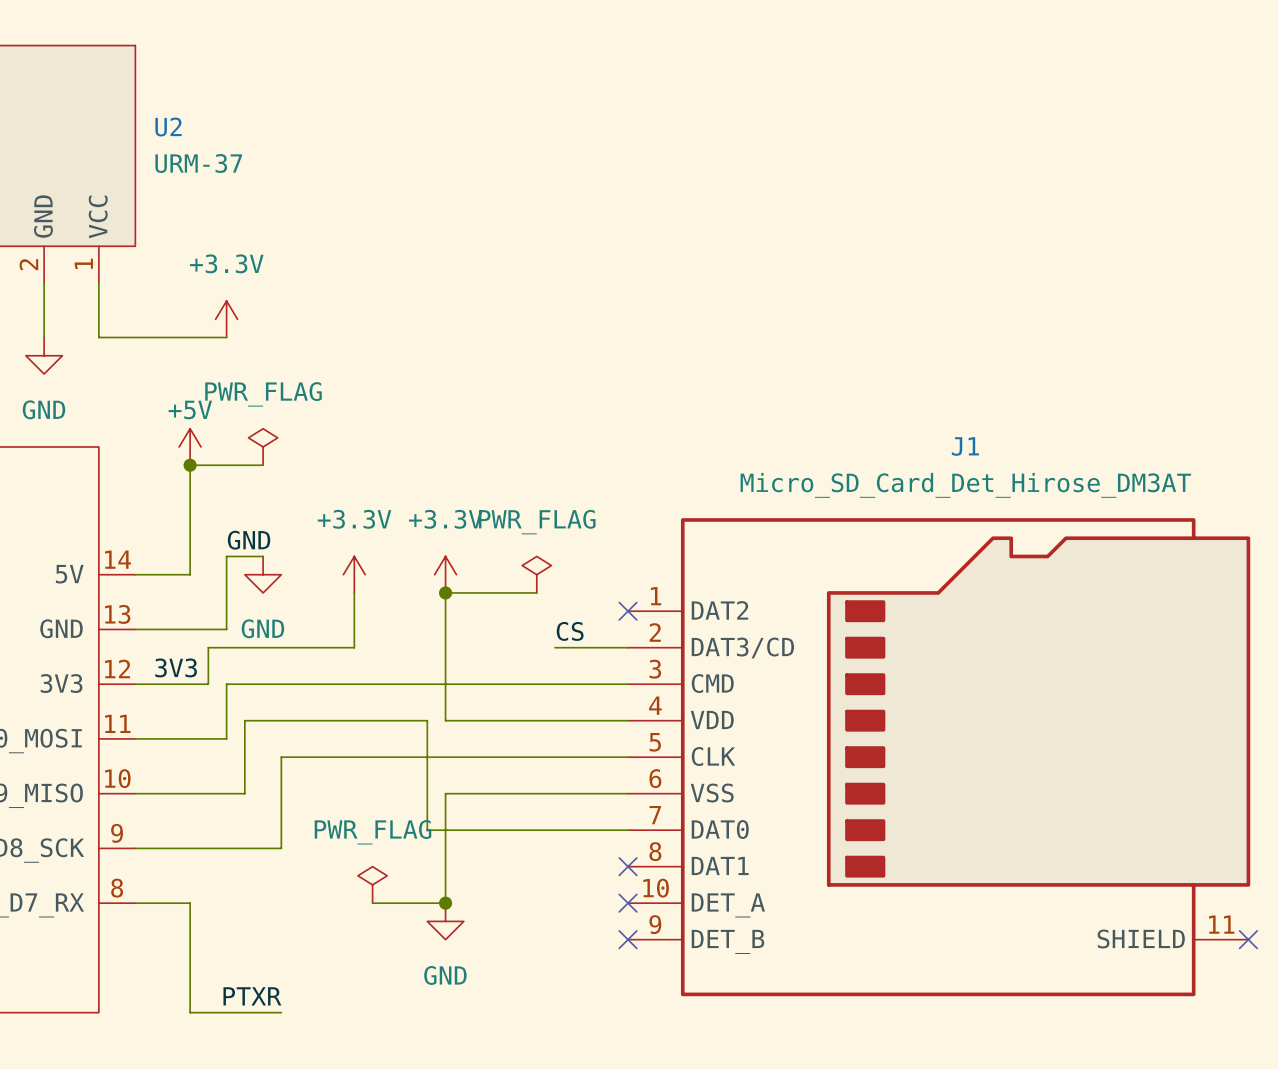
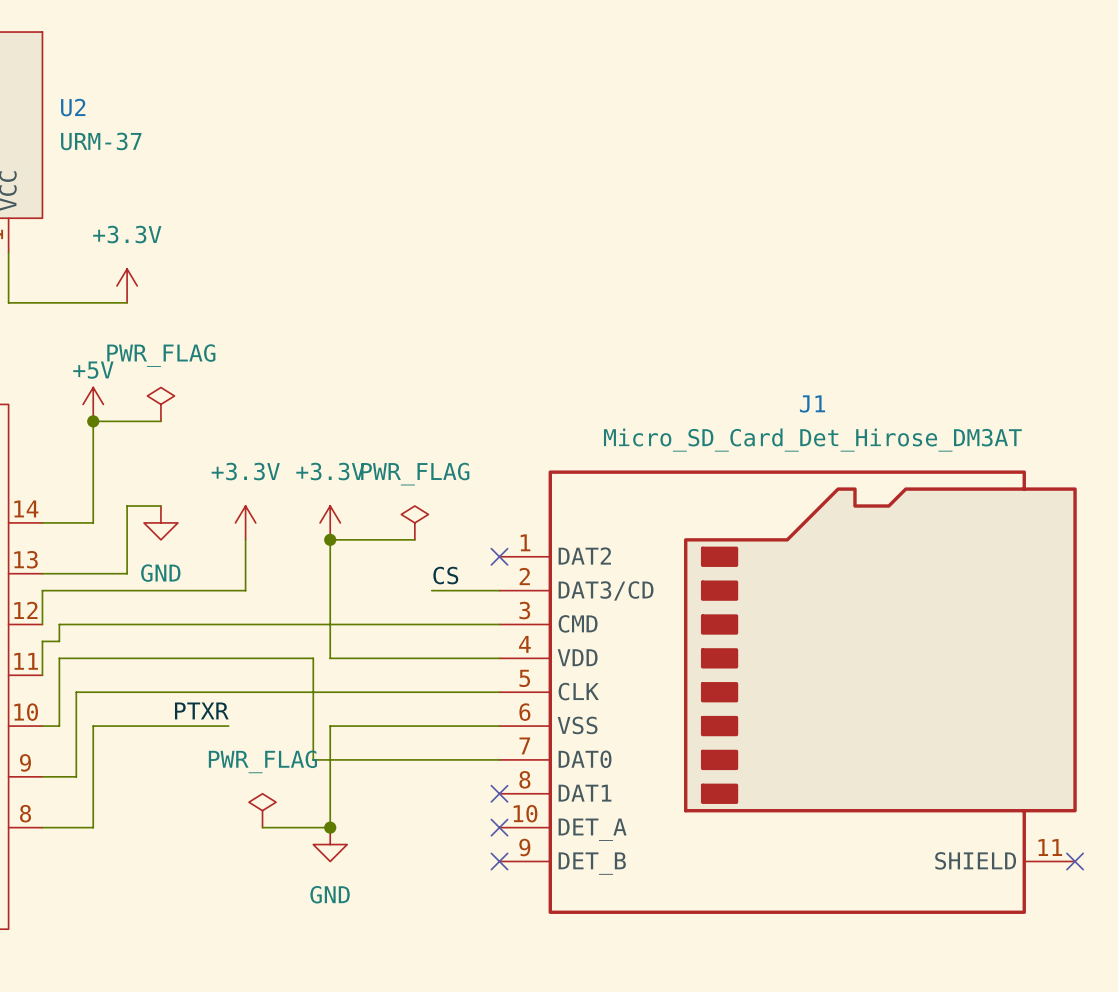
label: GND (249, 540) -> none
wire: (208, 647) (208, 684) -> (127, 624) (110, 624)
wire: none -> (110, 590) (42, 590) (42, 624)
label: 3V3 (176, 667) -> none
wire: (135, 684) (153, 684) -> (42, 675) (42, 641) (59, 641) (59, 624)
wire: (226, 684) (226, 738) (135, 738) -> none
wire: (244, 720) (244, 793) -> (144, 658) (59, 658) (59, 726)
wire: (281, 757) (281, 848) (171, 848) -> (177, 692) (76, 692) (76, 776)
wire: (153, 793) (190, 793) -> (93, 827) (93, 726)
wire: none -> (144, 726) (228, 726)
wire: (190, 903) (190, 1012) (281, 1012) -> none
label position: PTXR (252, 996) -> PTXR (201, 710)

